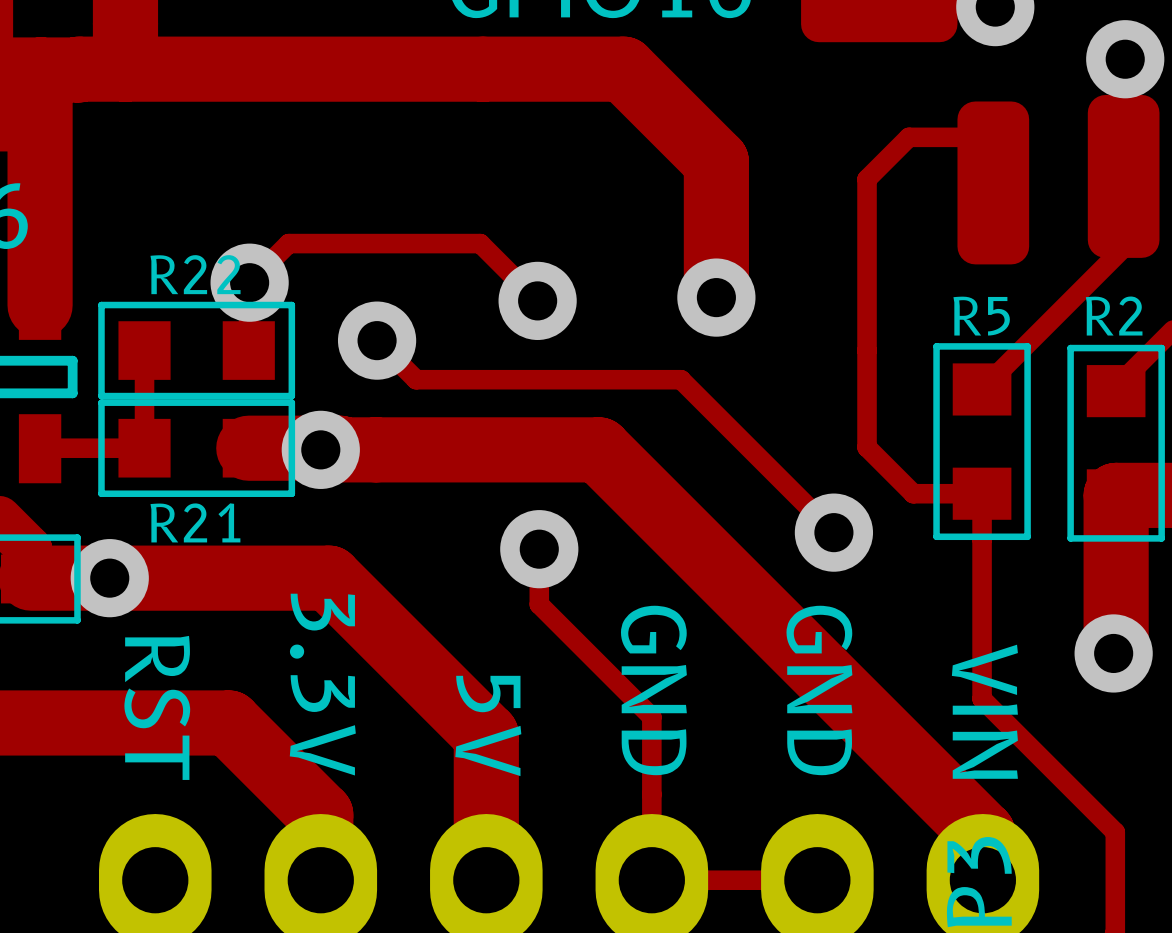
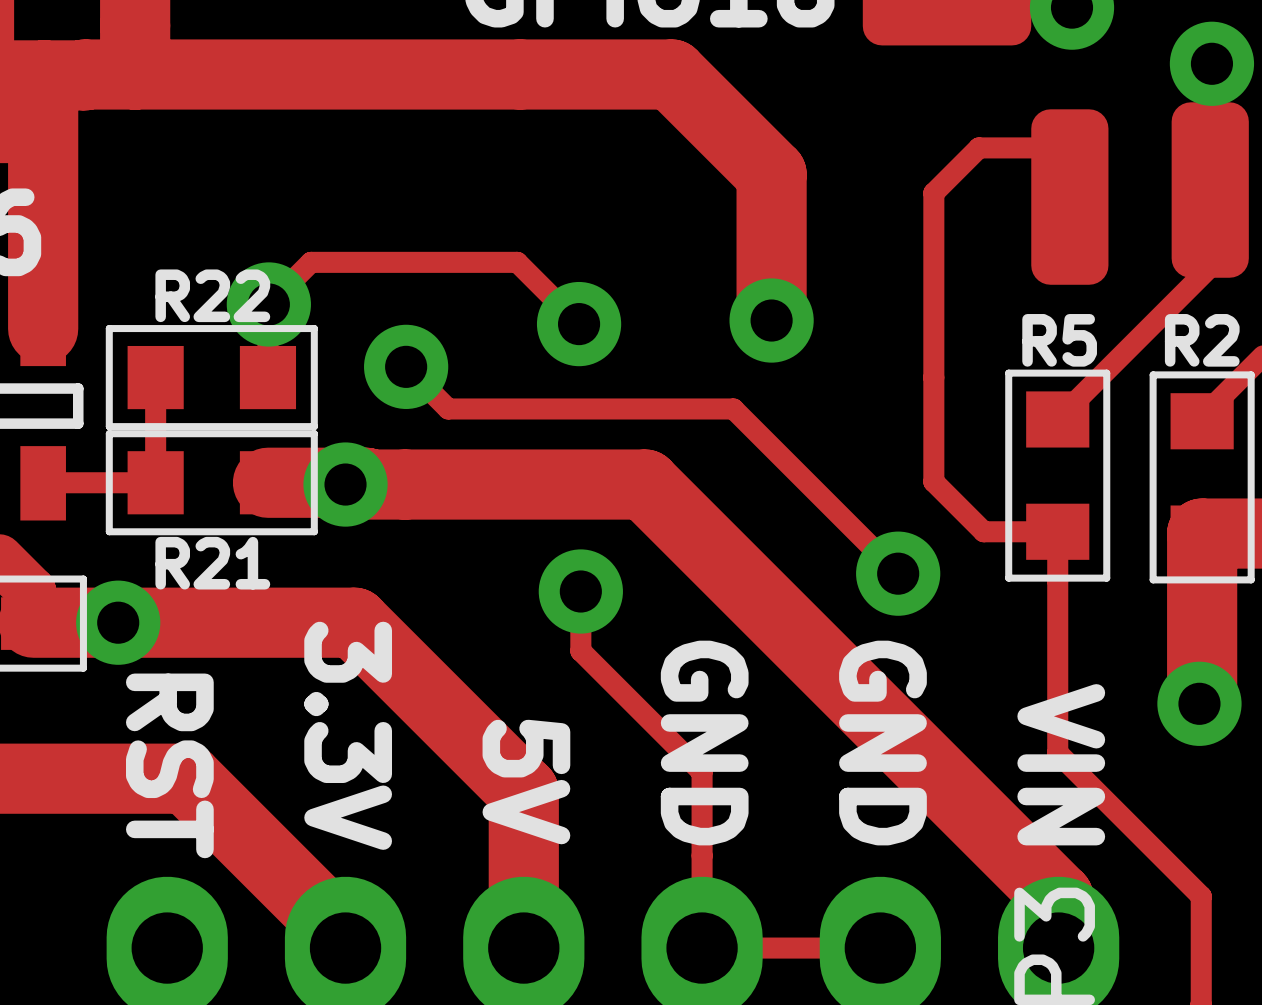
track: (173, 722) (228, 722) (320, 814) (320, 870) -> (186, 778) (345, 937)

